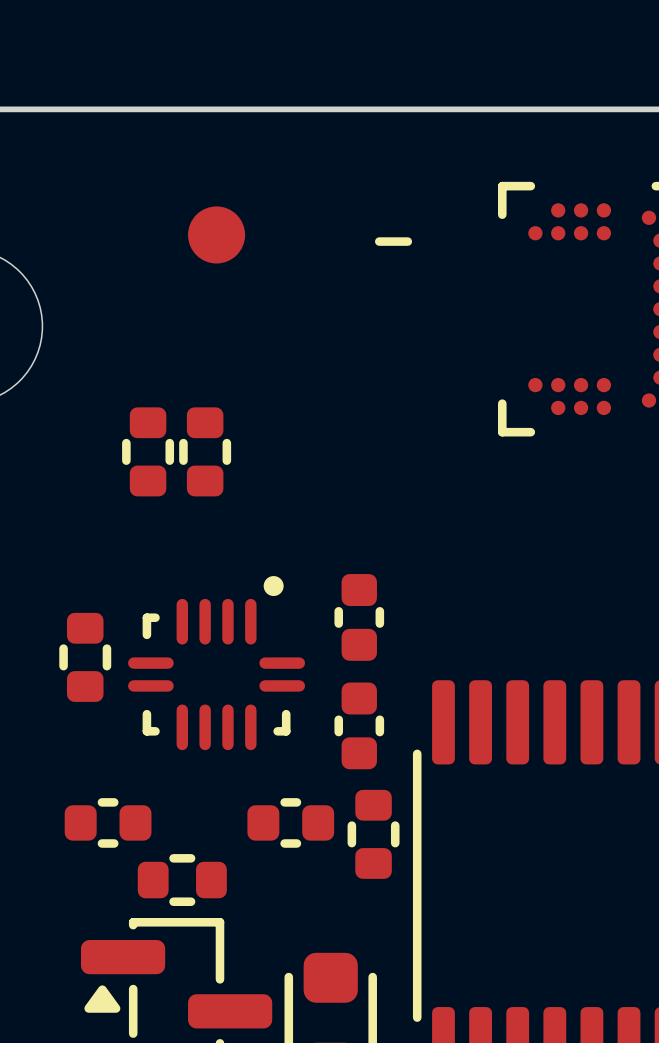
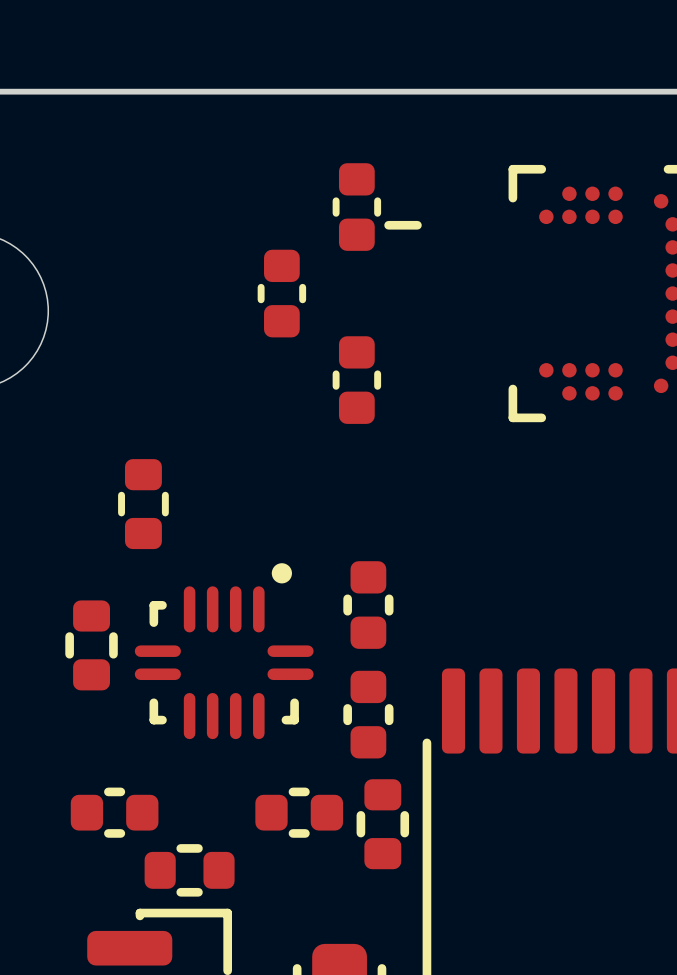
part: none -> (356, 207)
part: (216, 234) -> none
part: none -> (281, 293)
part: none -> (356, 380)
part: (148, 451) -> none
part: (205, 451) -> none
part: none -> (143, 504)

